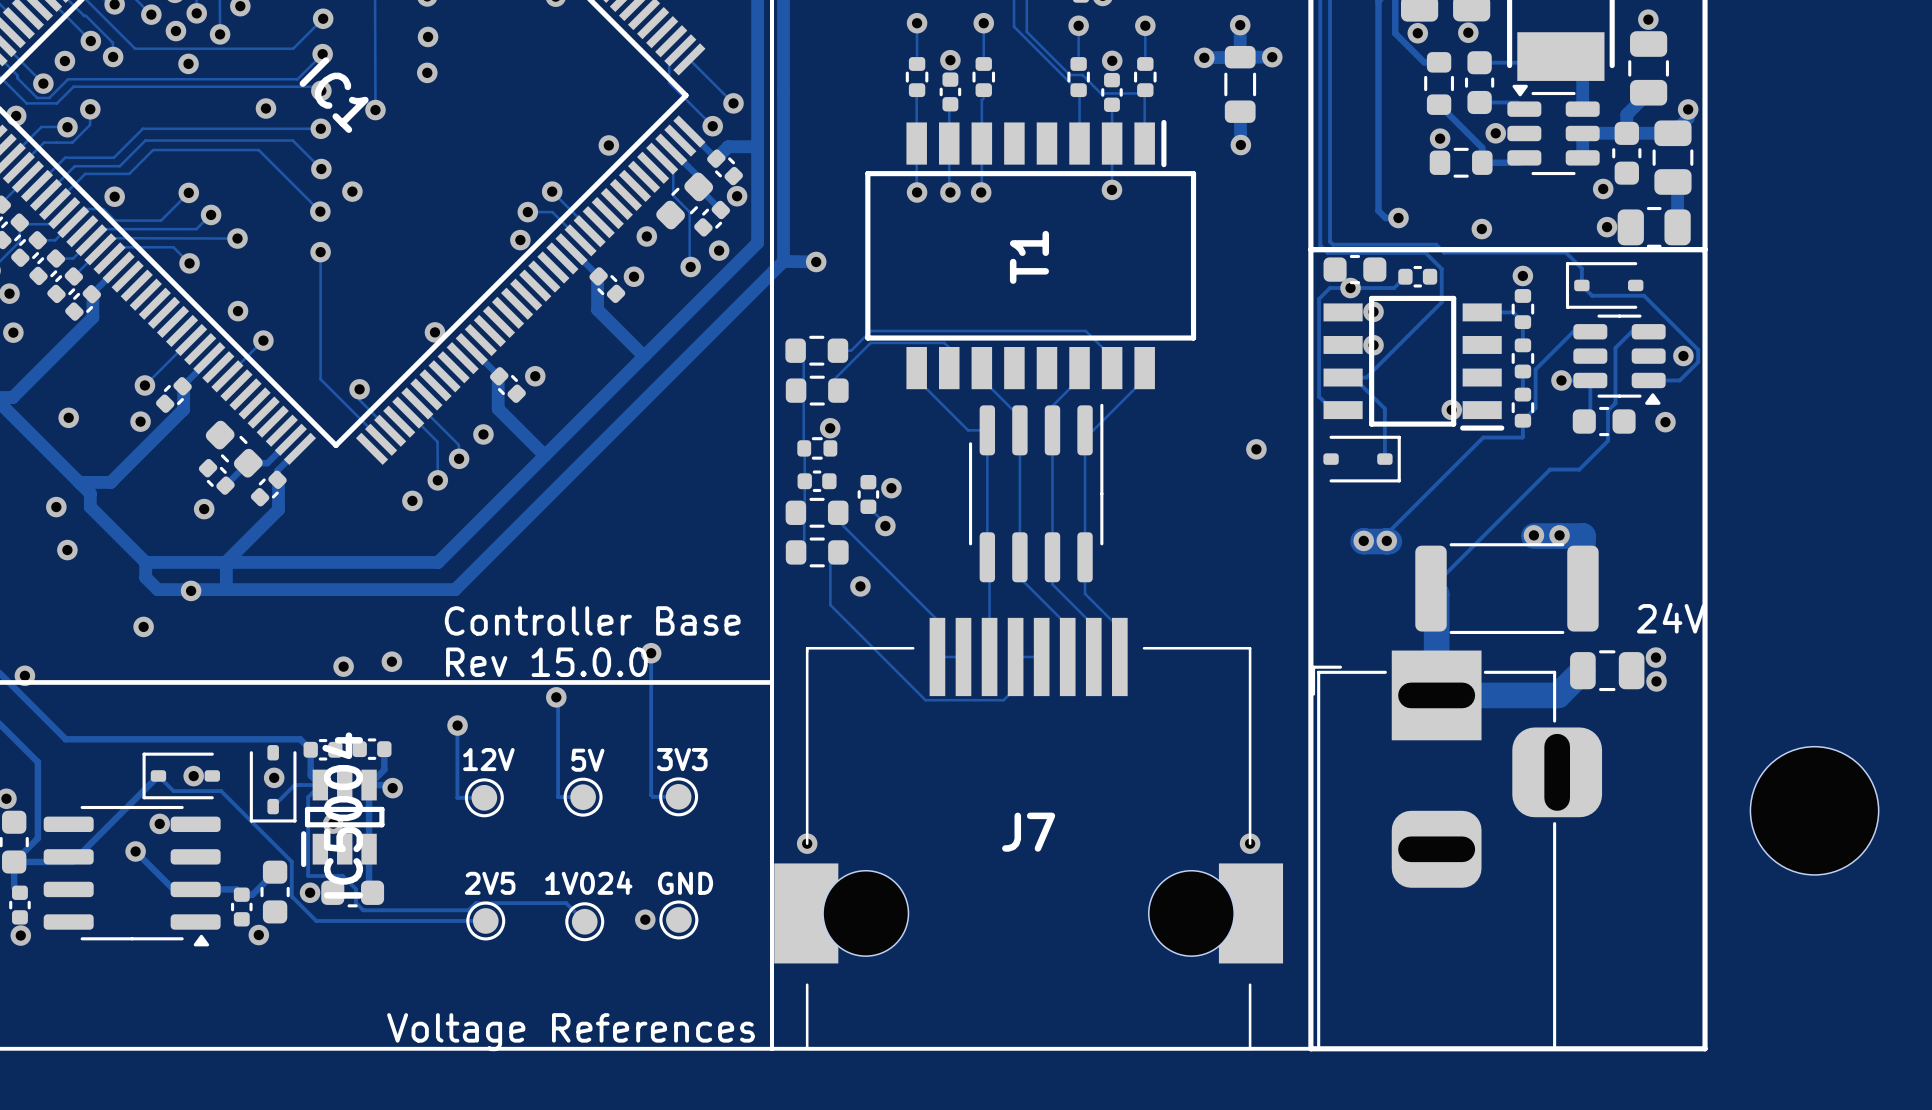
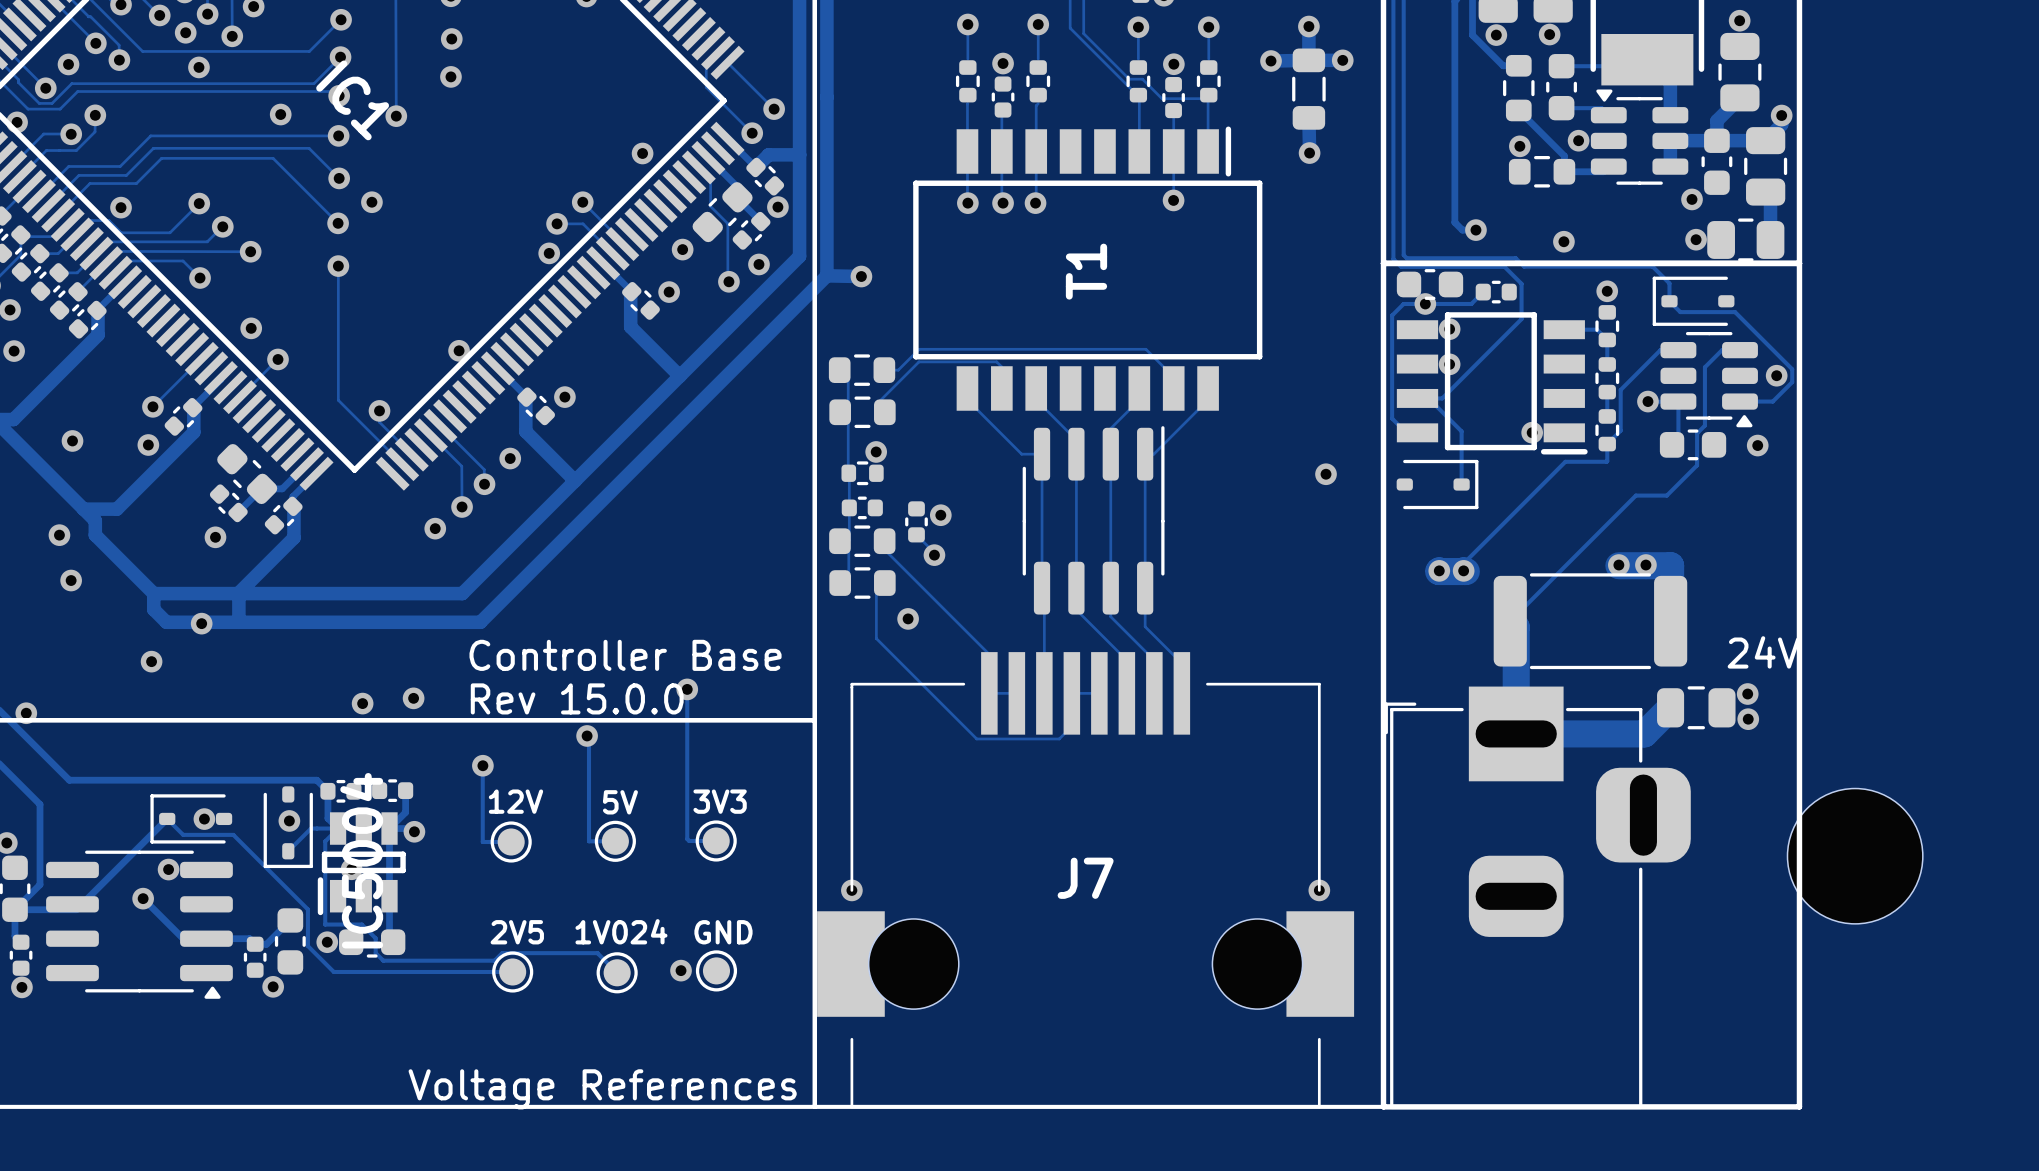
part position: (1814, 810) -> (1855, 856)

